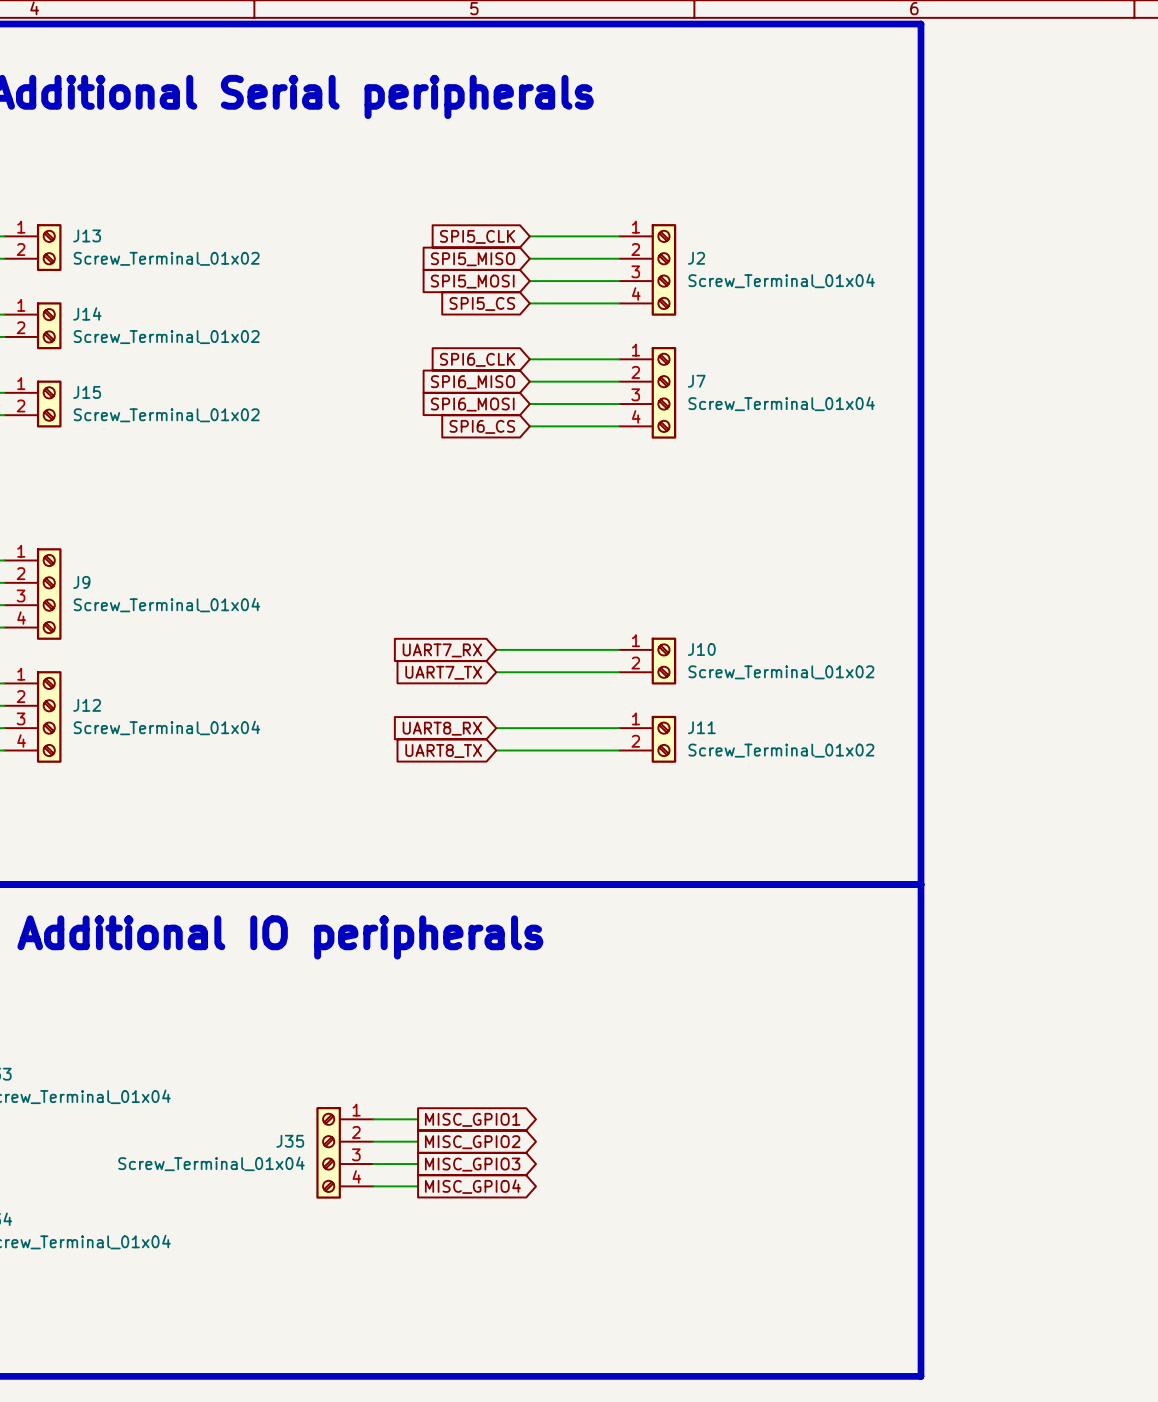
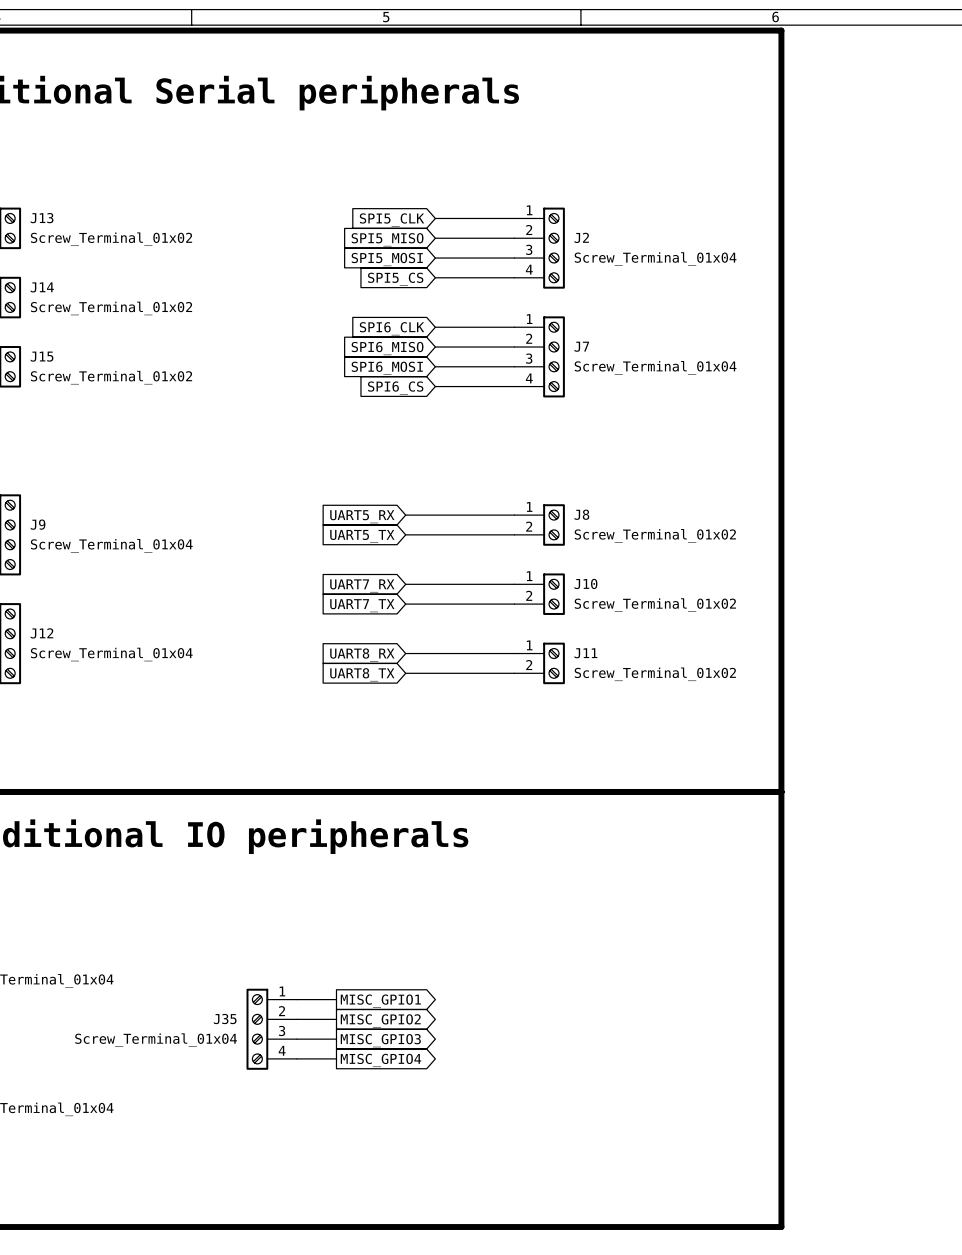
wire: none -> (405, 515) (514, 515)
global label: none -> UART5_RX (362, 516)
J8: none -> Screw_Terminal_01x02 (539, 524)
global label: none -> UART5_TX (362, 536)
wire: none -> (405, 534) (514, 534)

